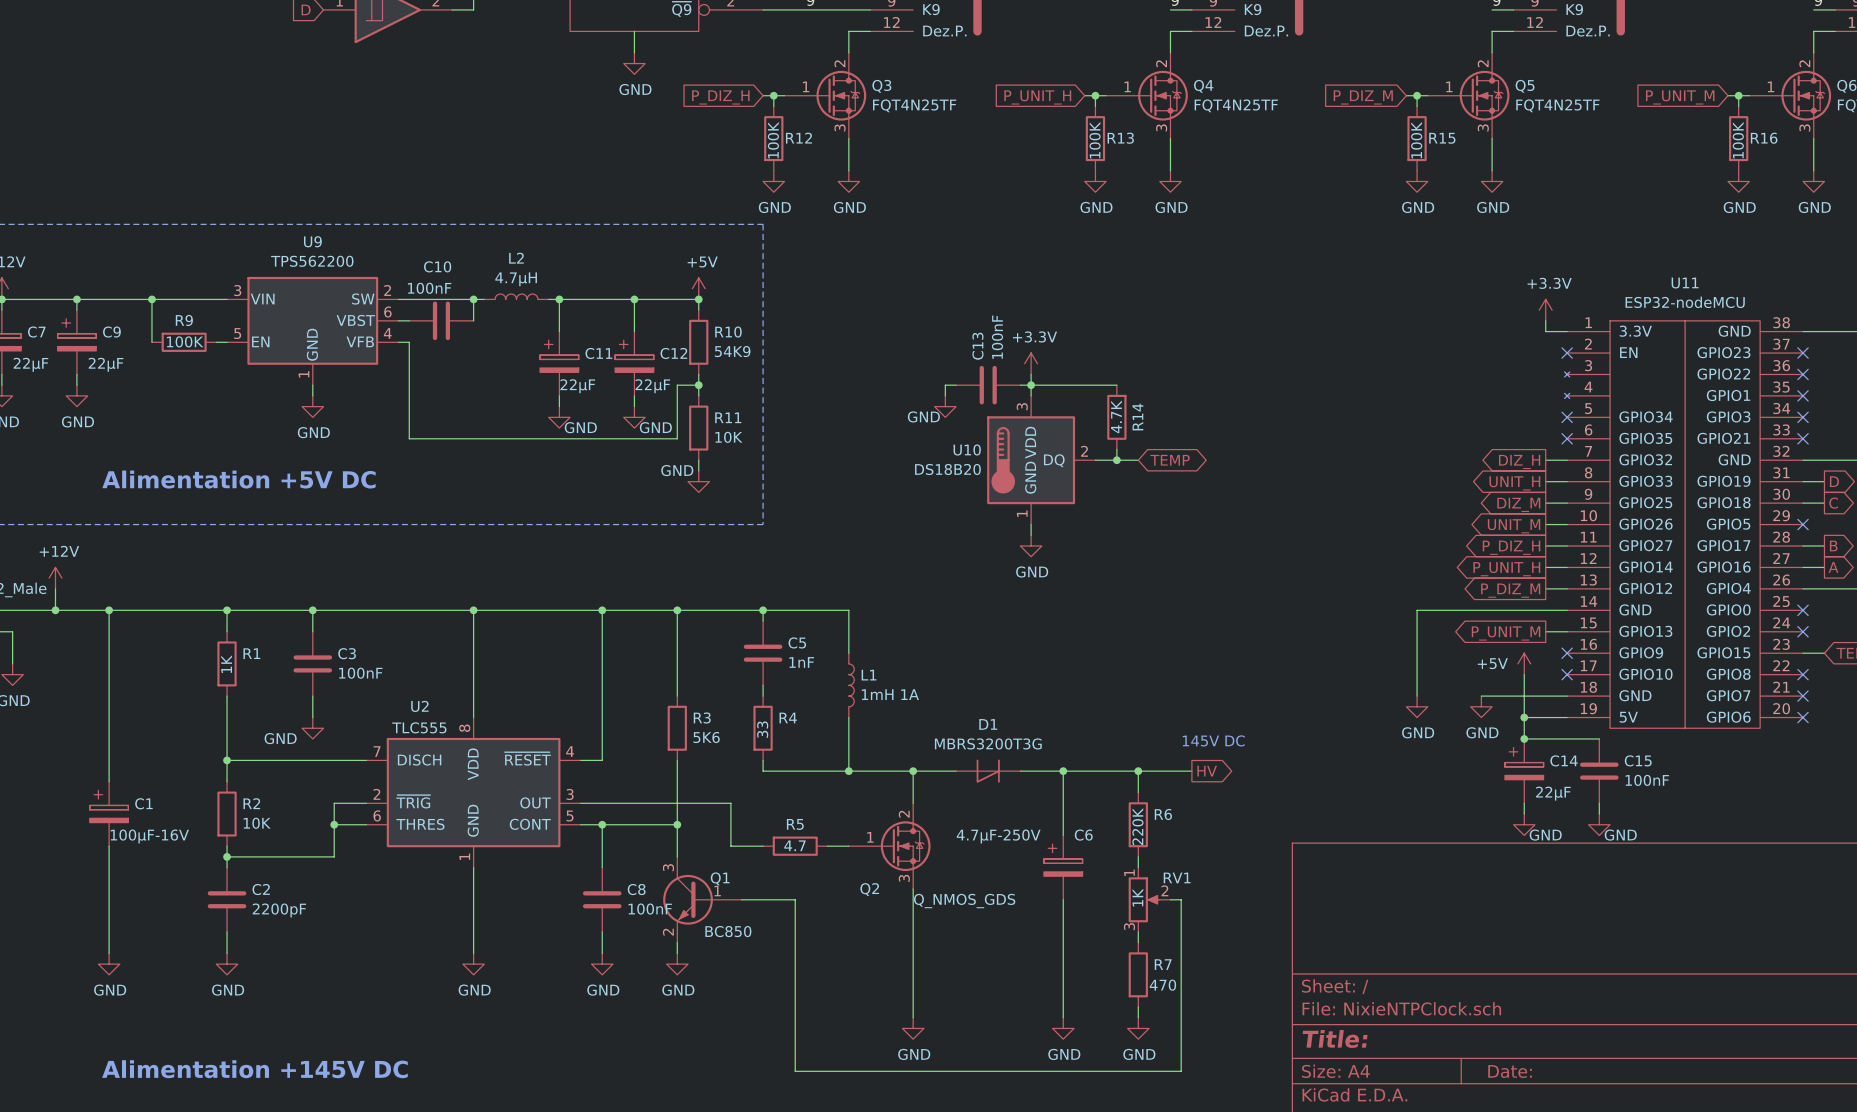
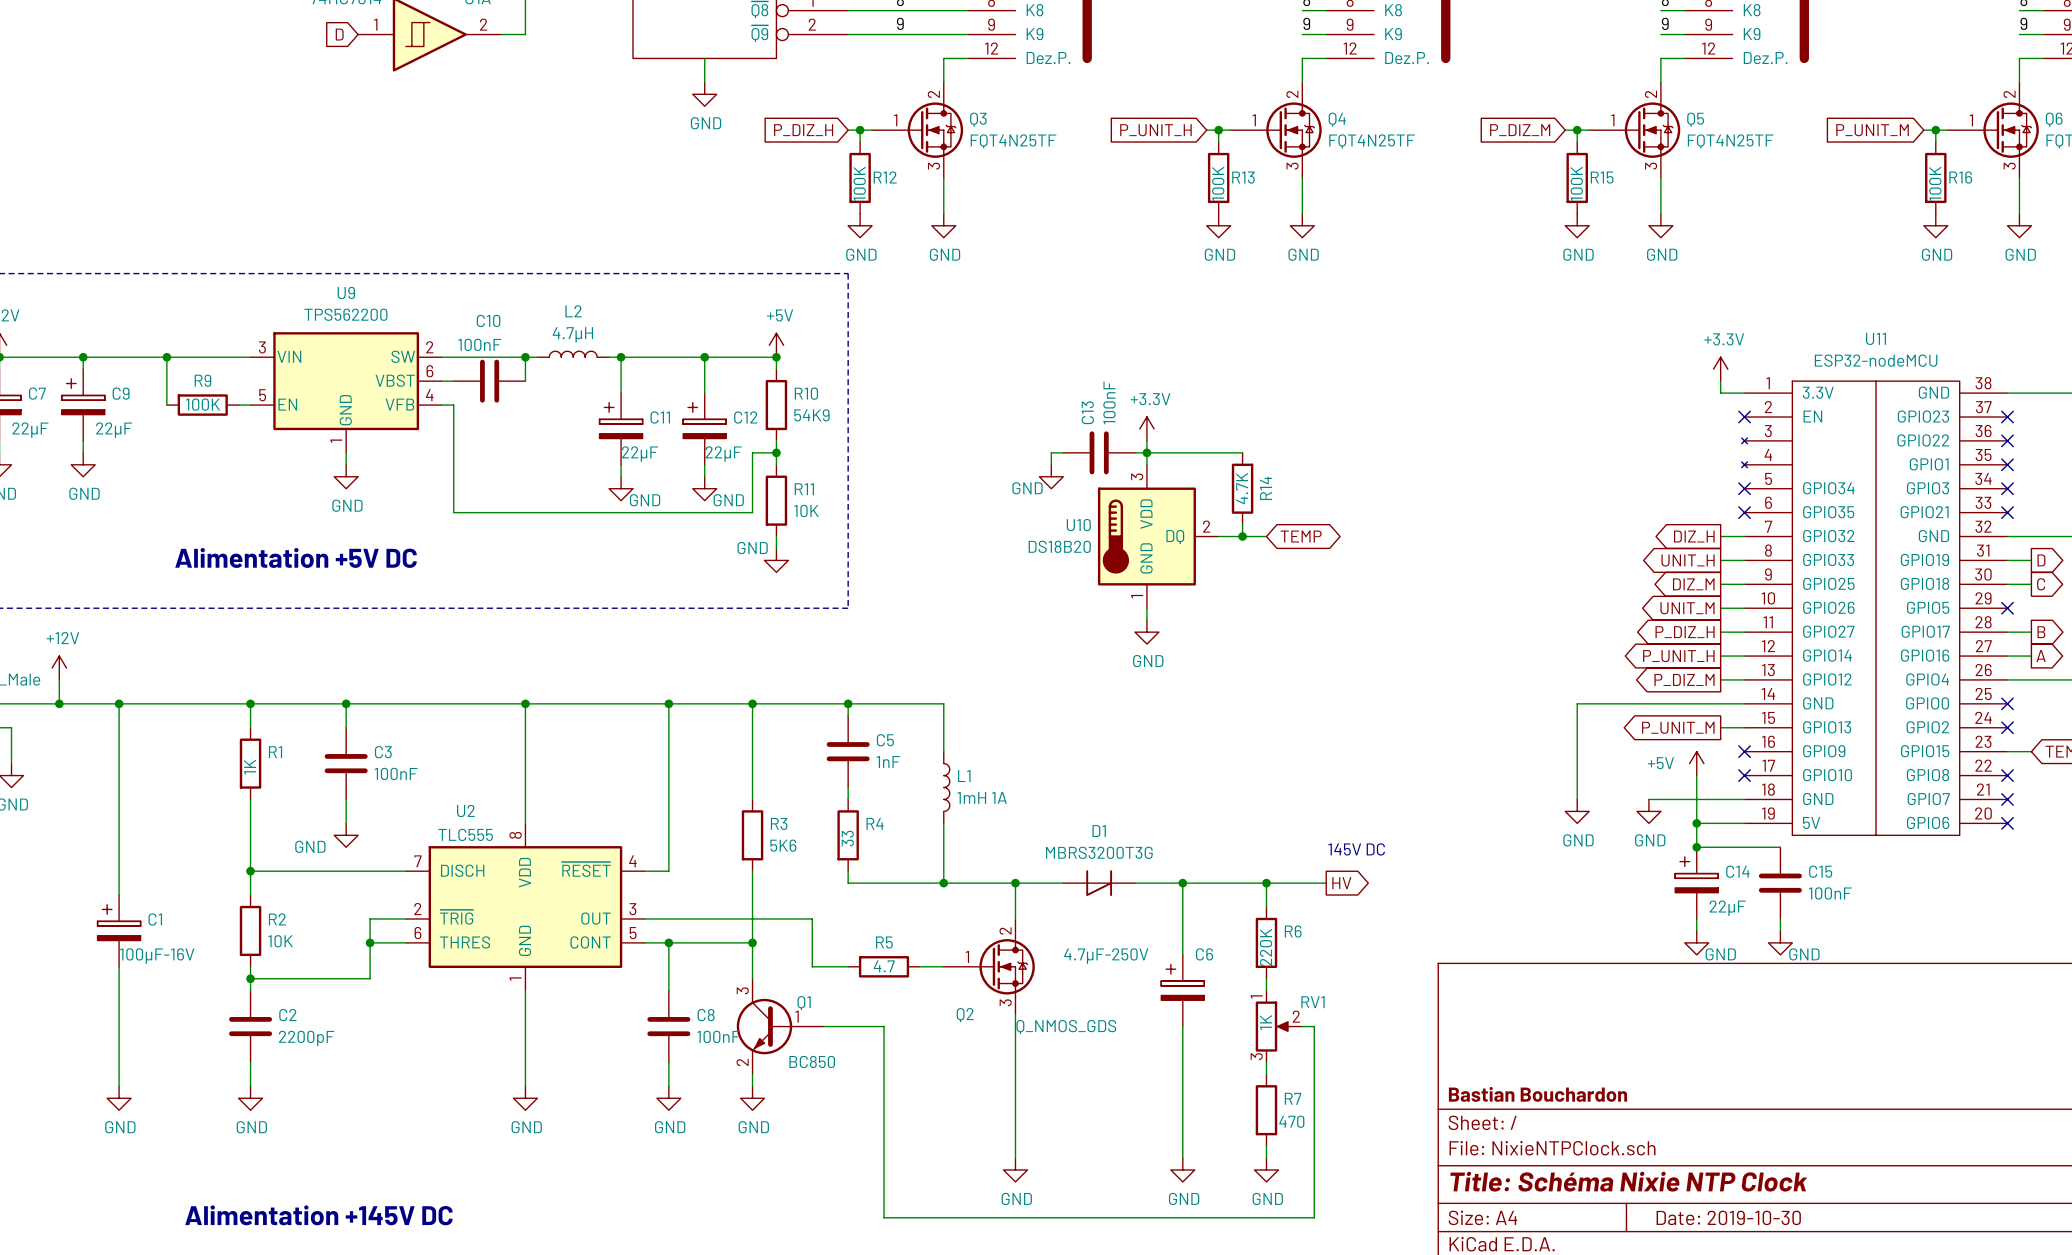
title block: none -> Bastian Bouchardon (1537, 1094)
title block: Title: (1335, 1038) -> Title: Schéma Nixie NTP Clock (1628, 1181)
title block: Date: (1510, 1071) -> Date: 2019-10-30 (1728, 1217)

